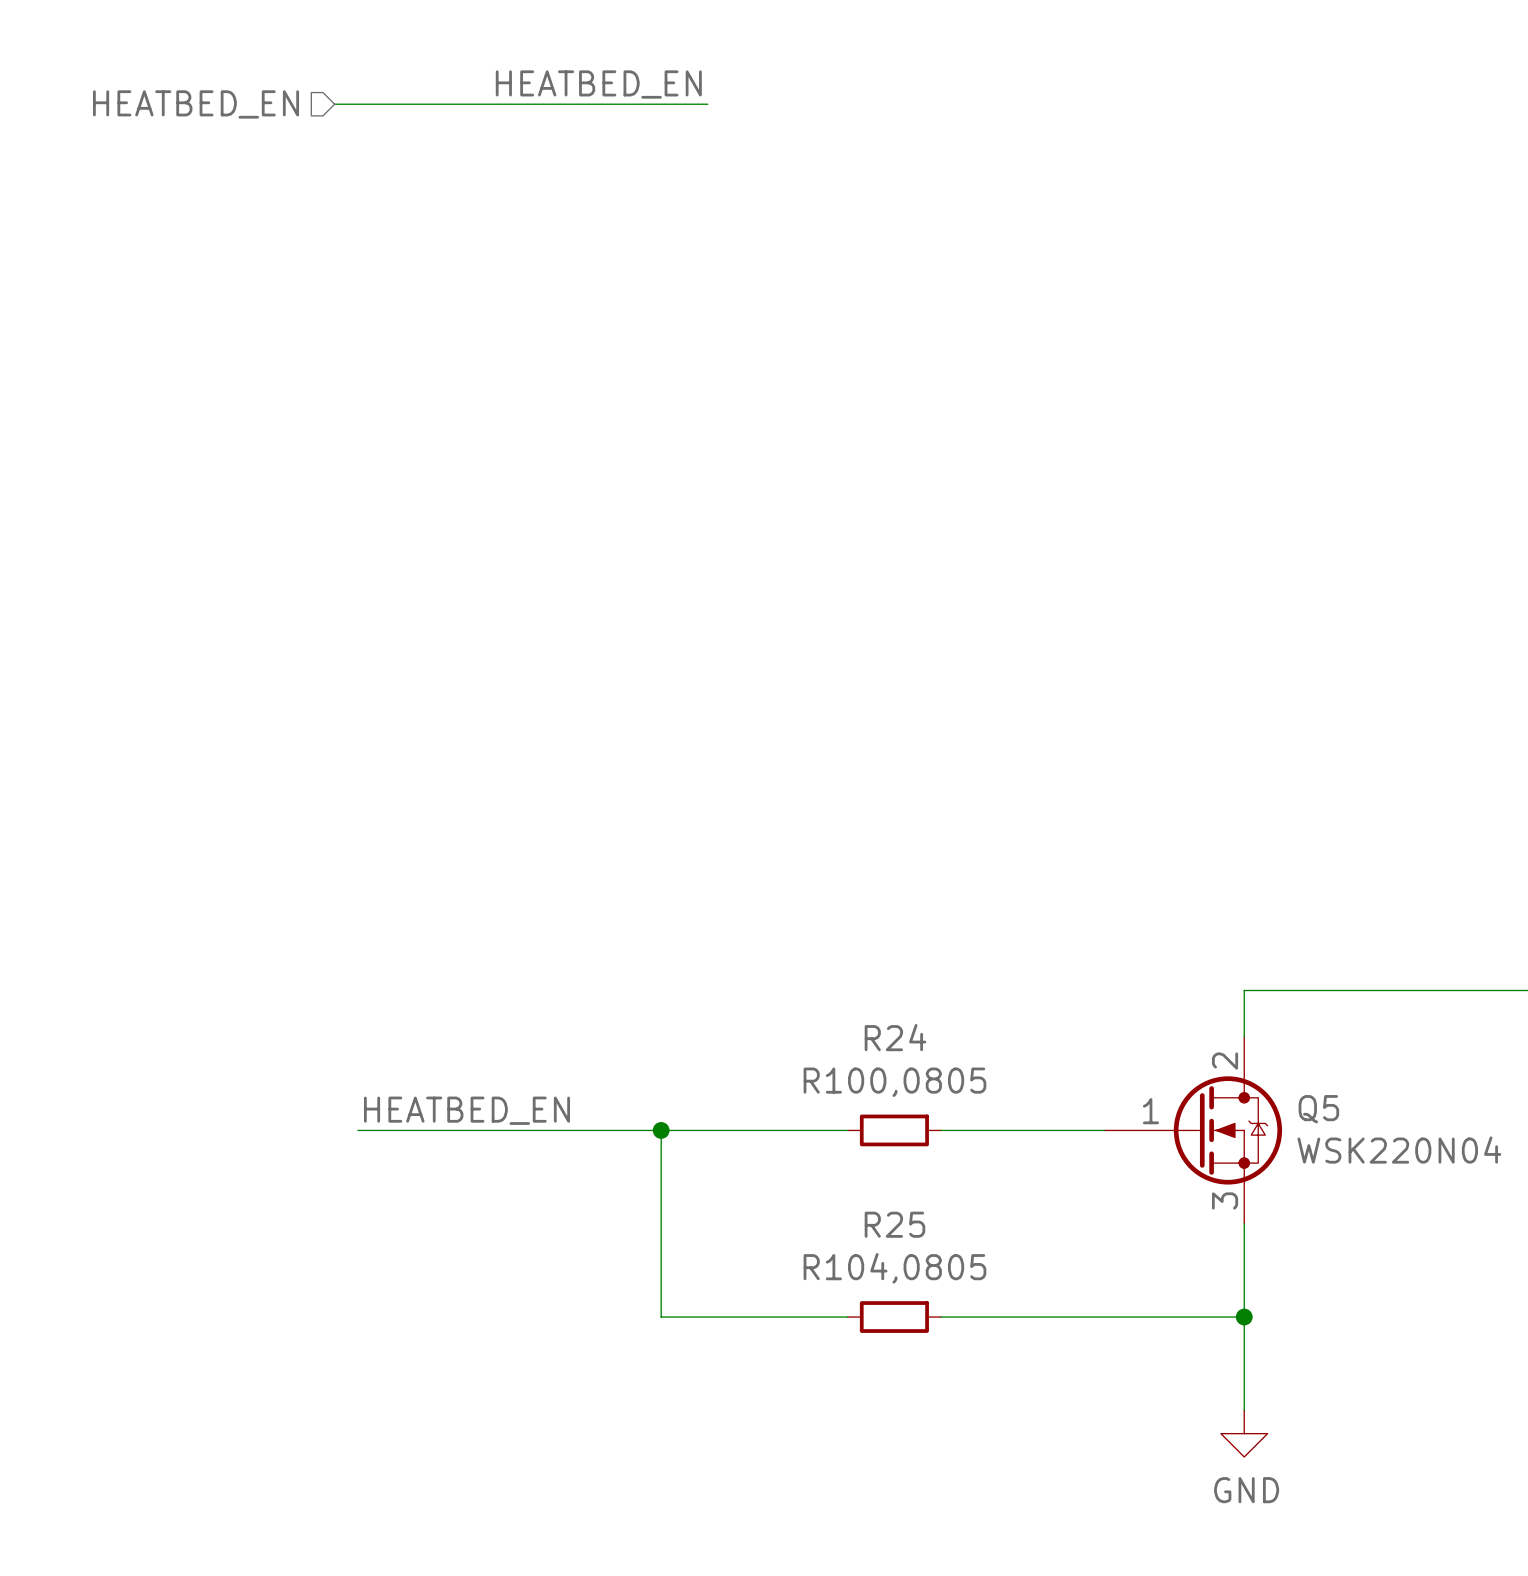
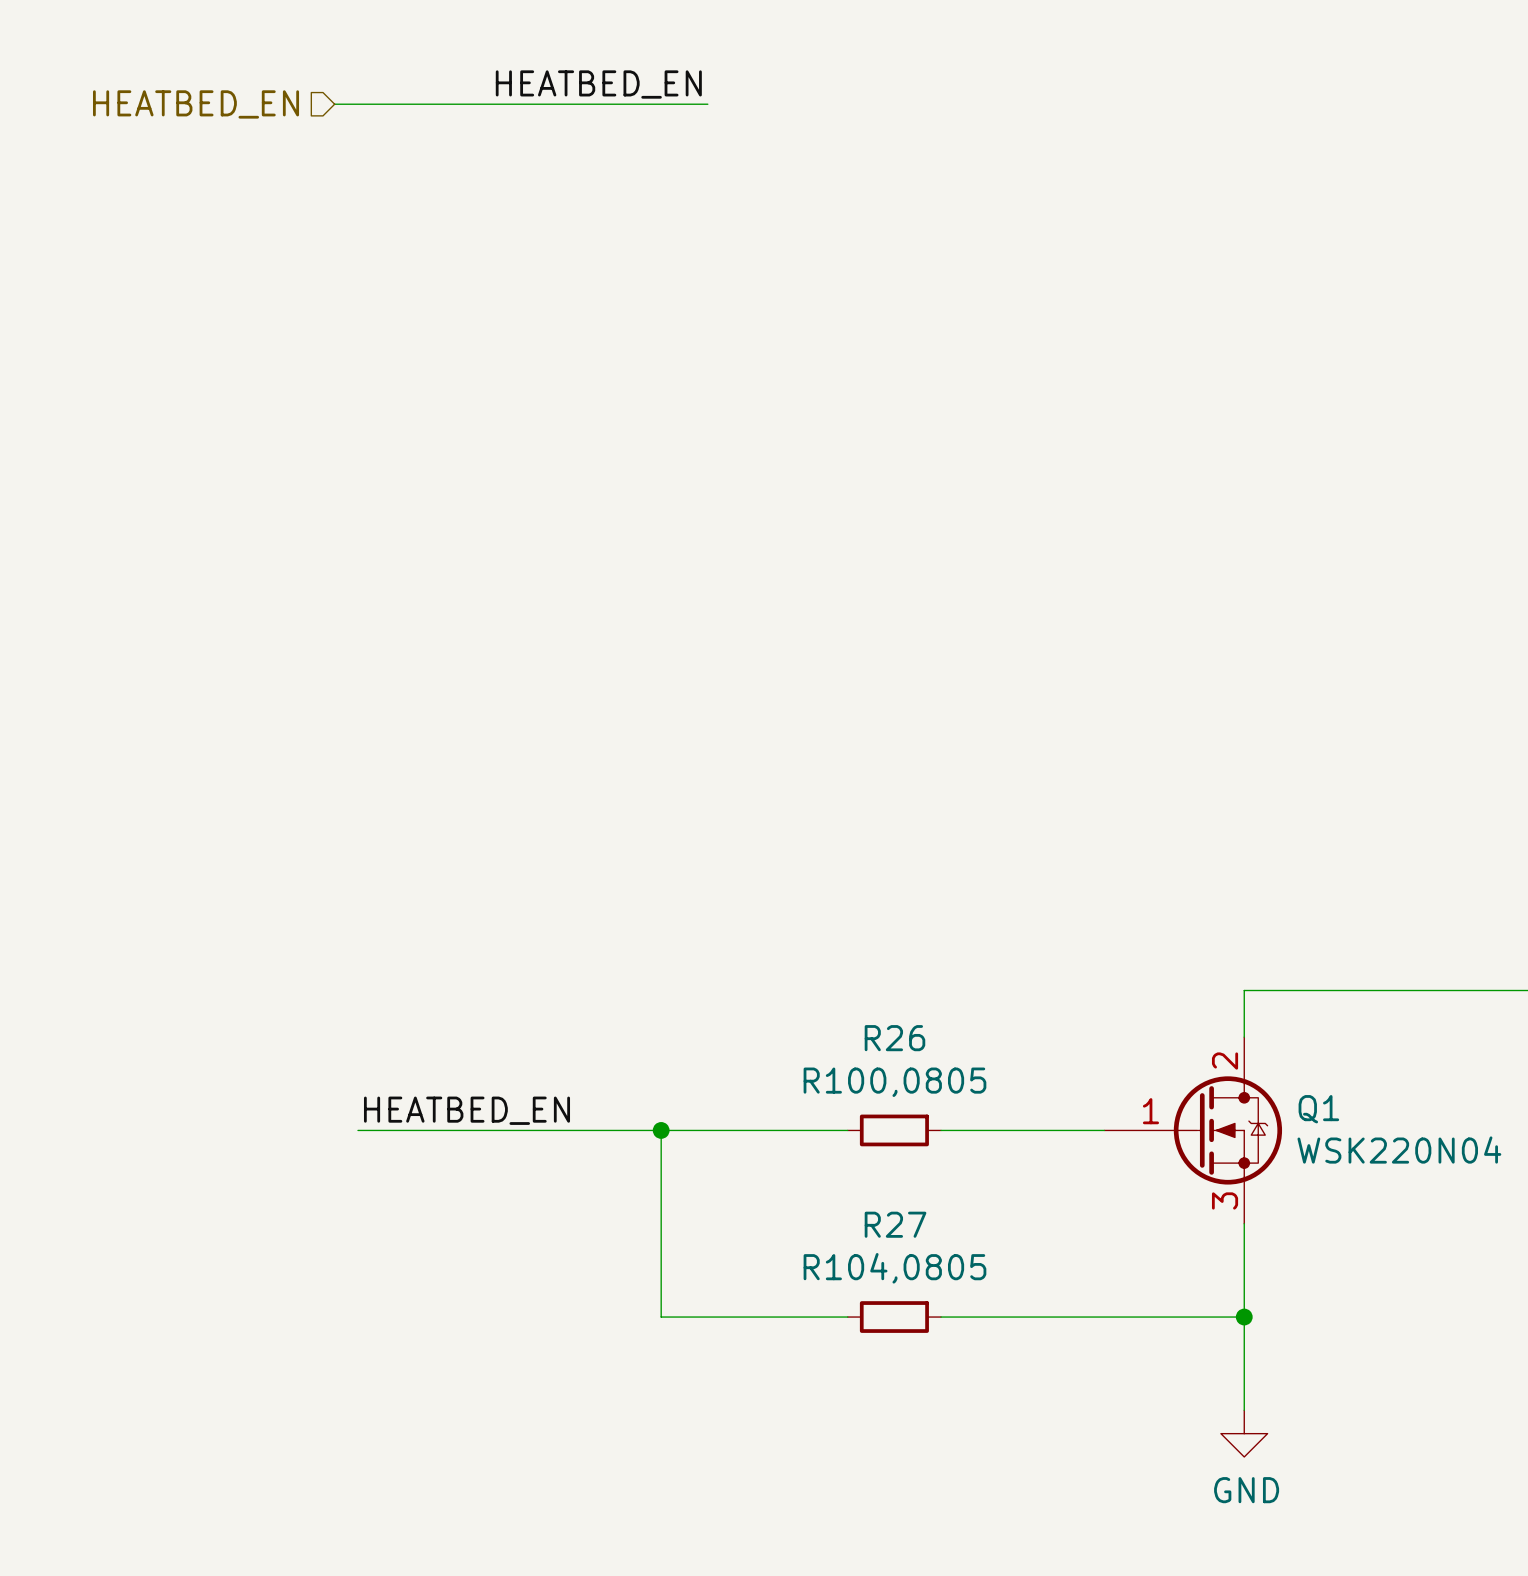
R24 name: R24 (895, 1037) -> R26 (894, 1038)
Q5 name: Q5 (1318, 1109) -> Q1 (1318, 1109)
R25 name: R25 (894, 1224) -> R27 (895, 1224)

